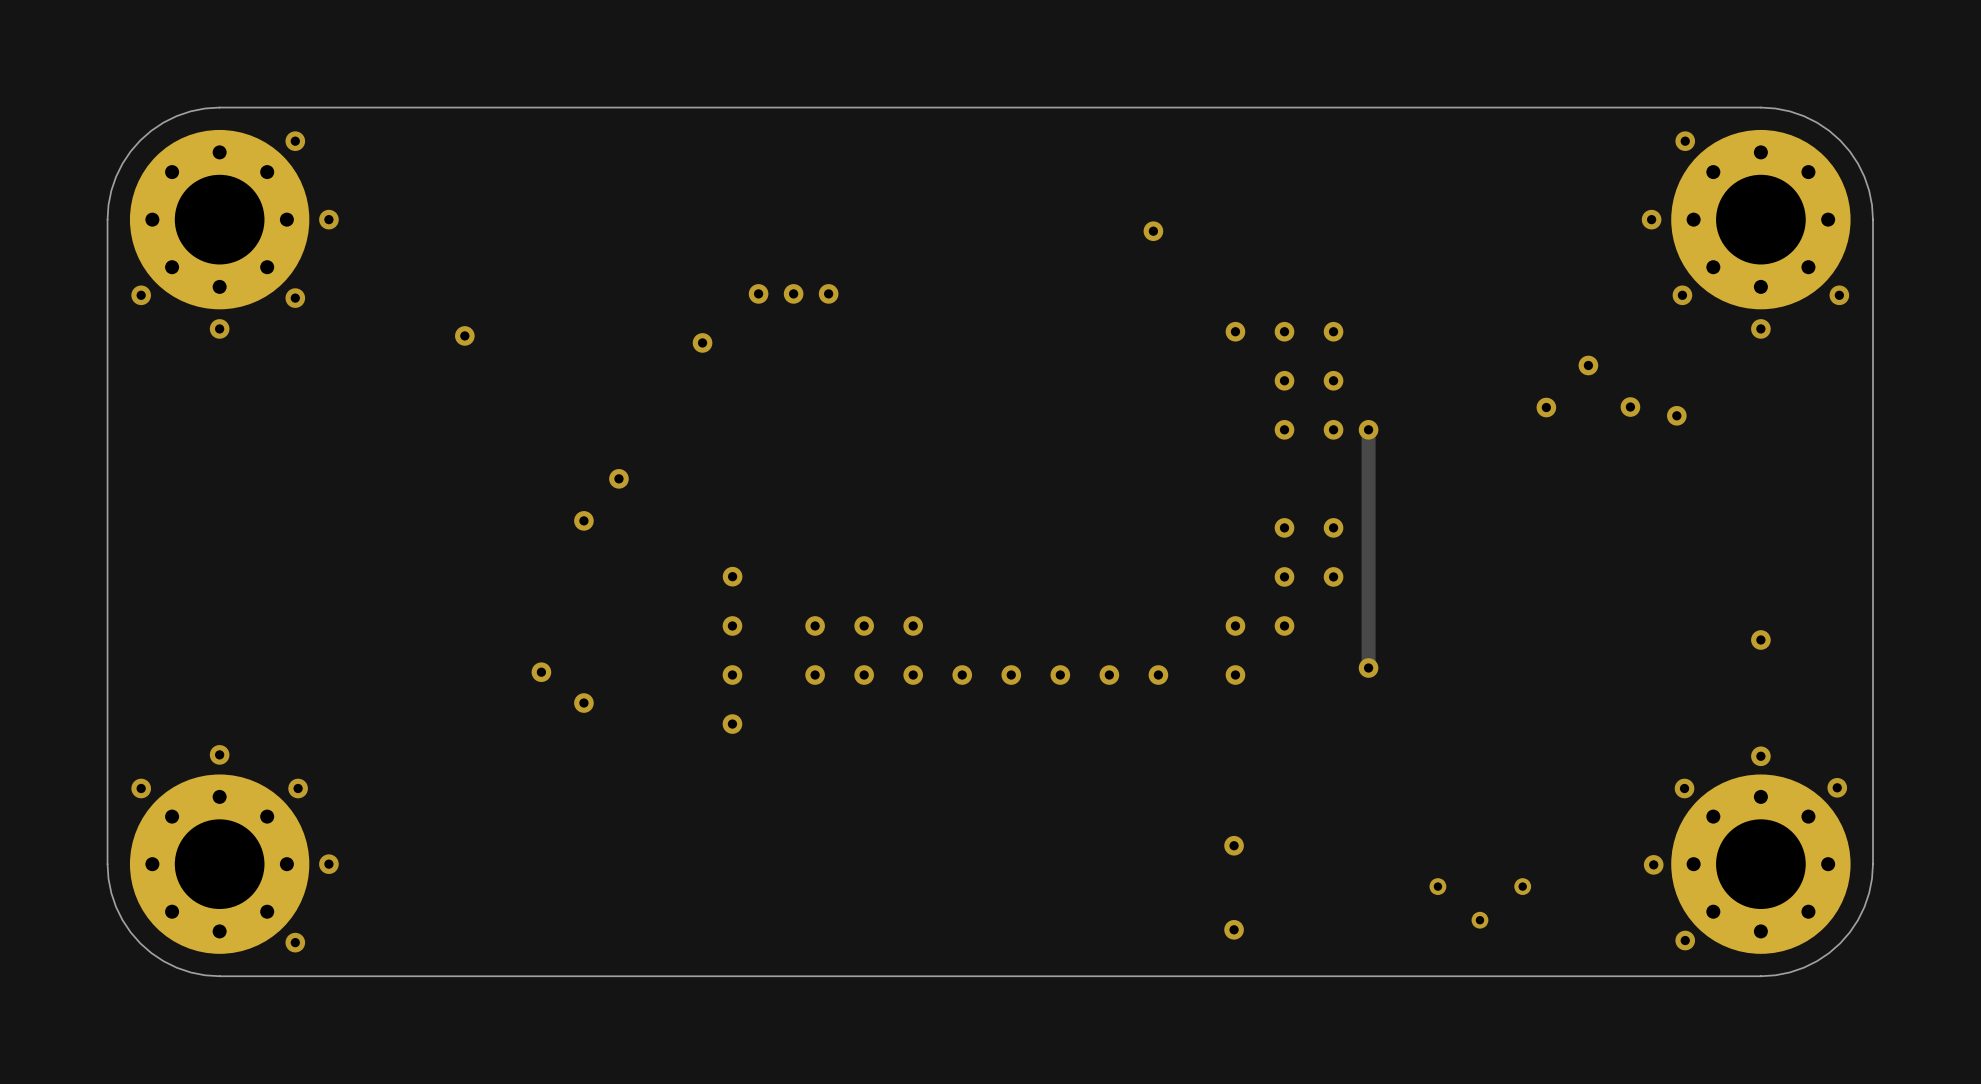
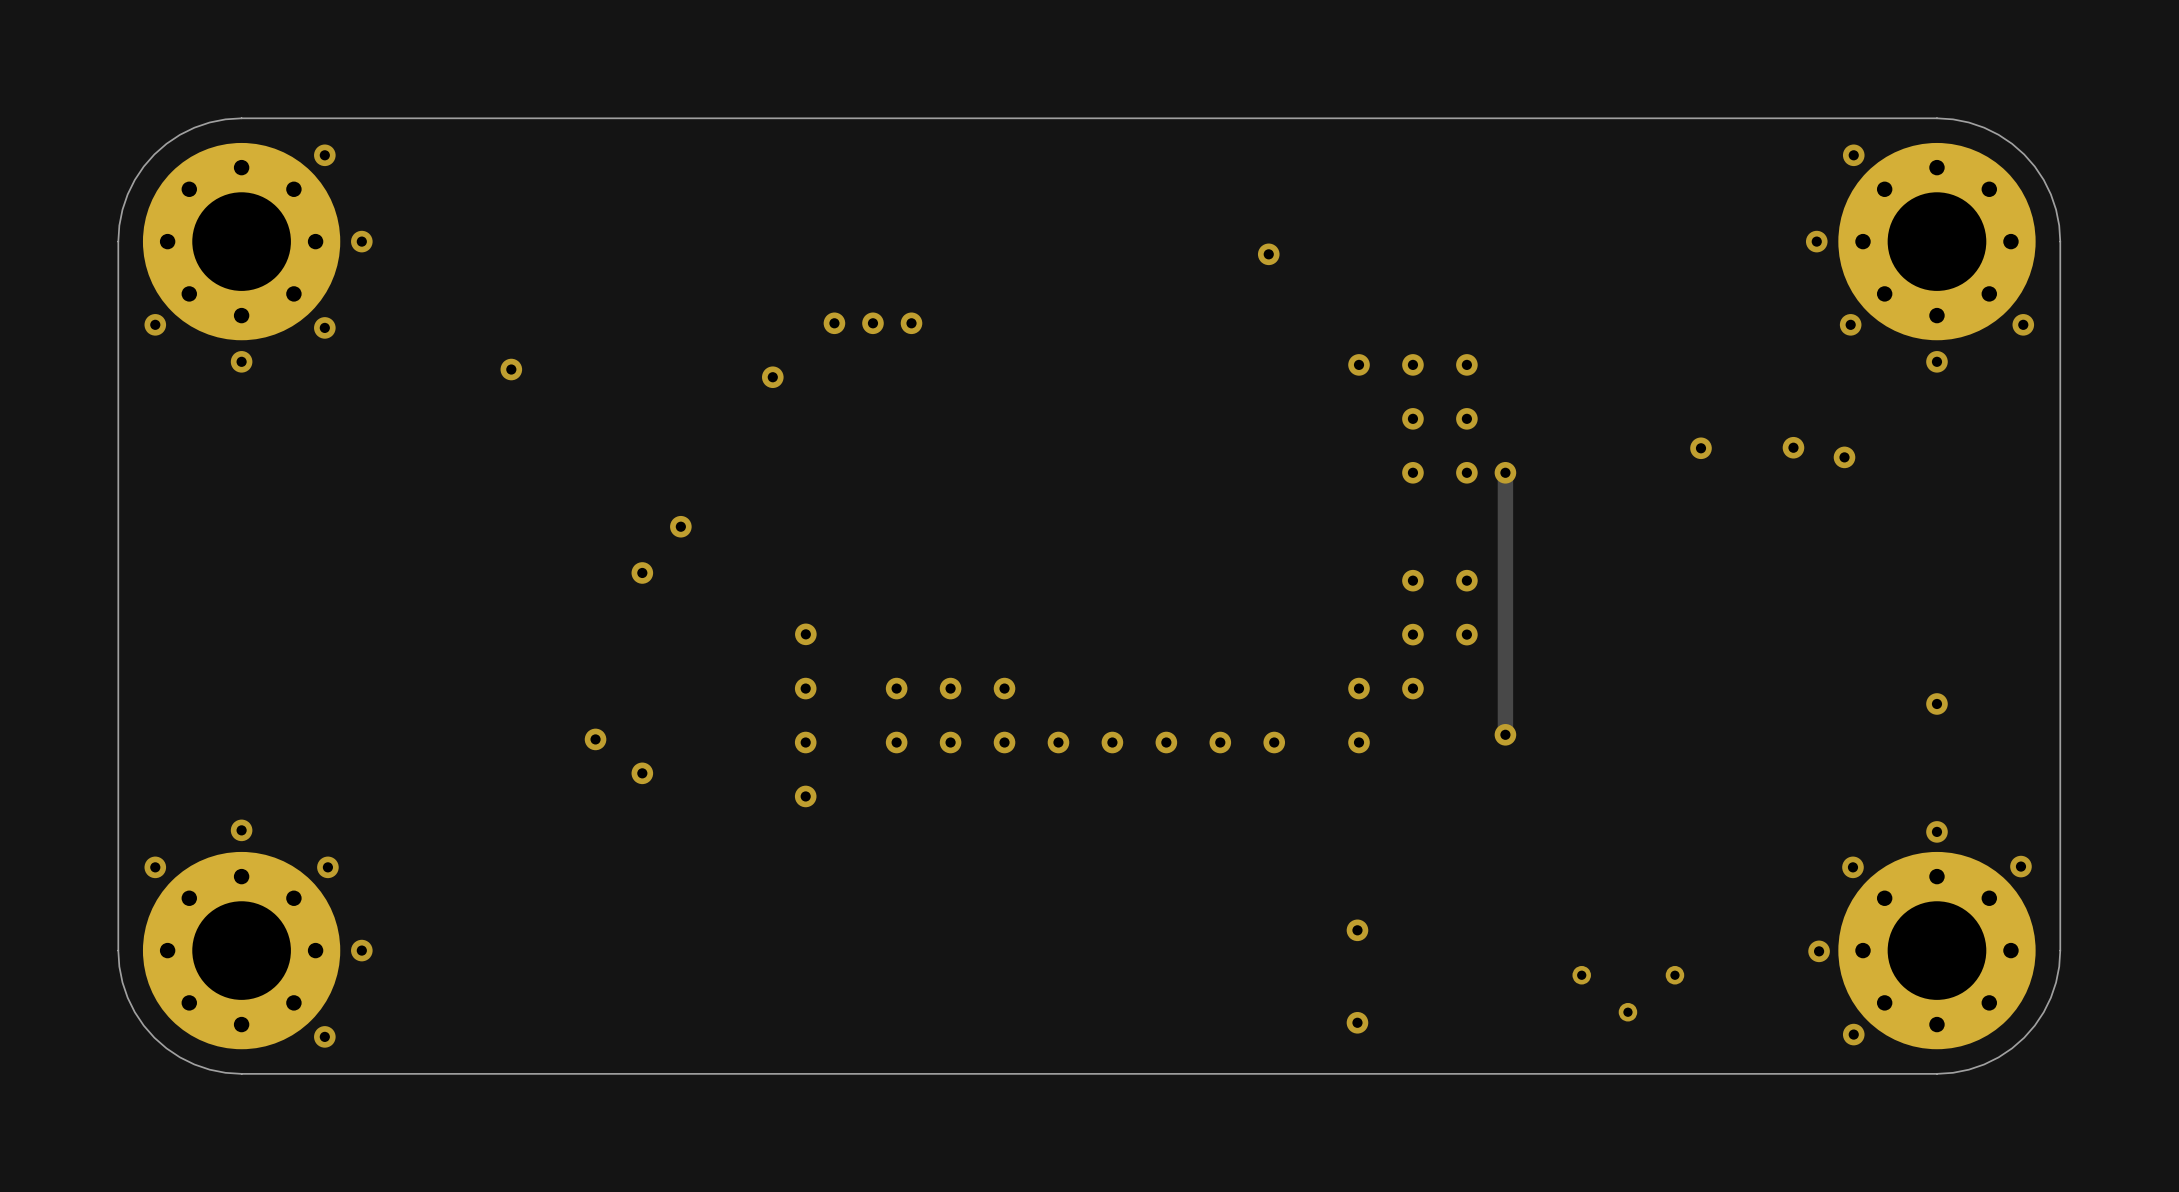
via: (1588, 365) -> none

